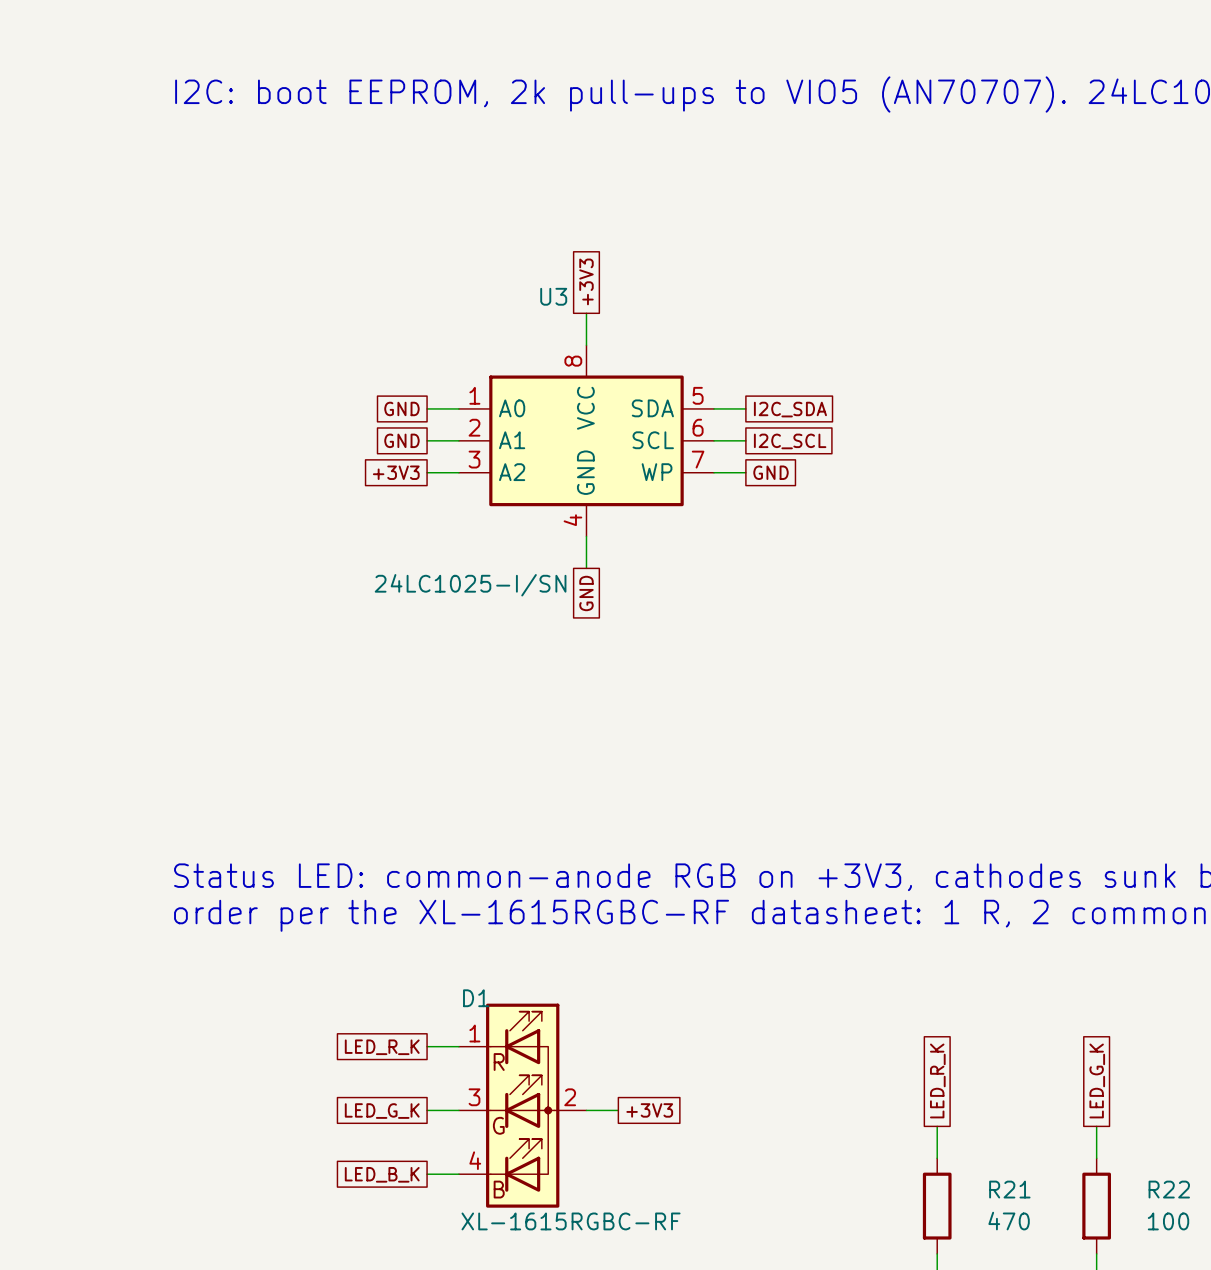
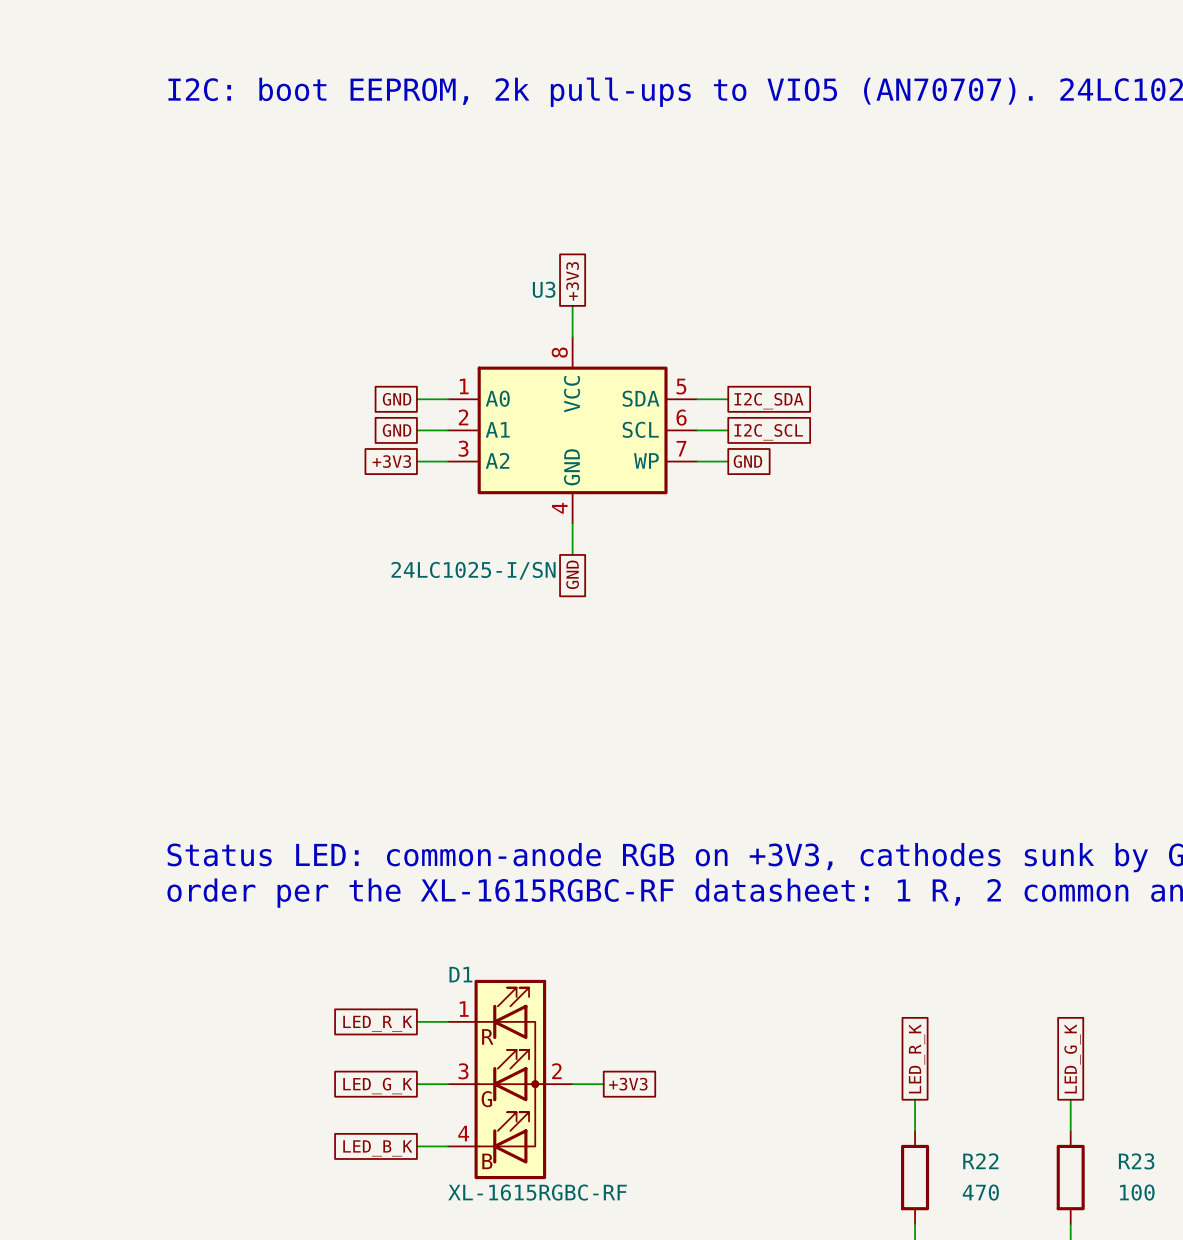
R21 name: R21 (1009, 1189) -> R22 (980, 1161)
R22 name: R22 (1169, 1189) -> R23 (1136, 1161)

